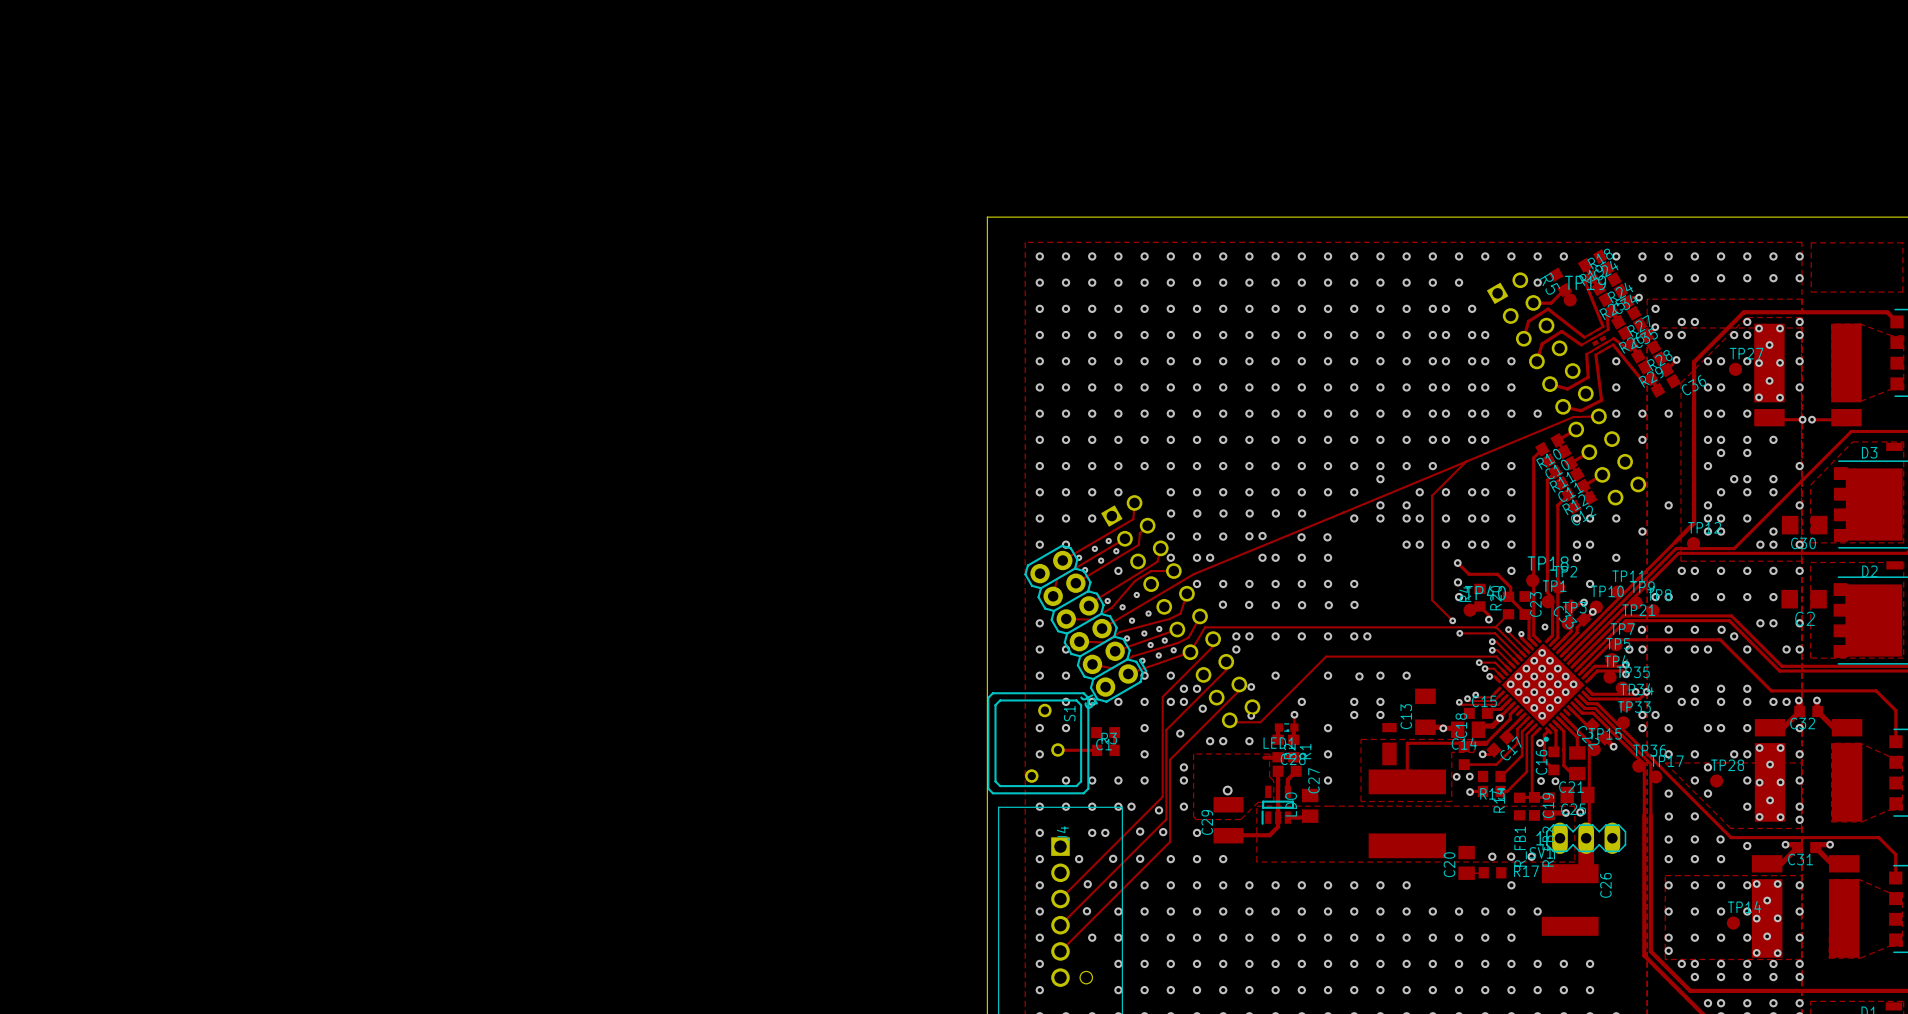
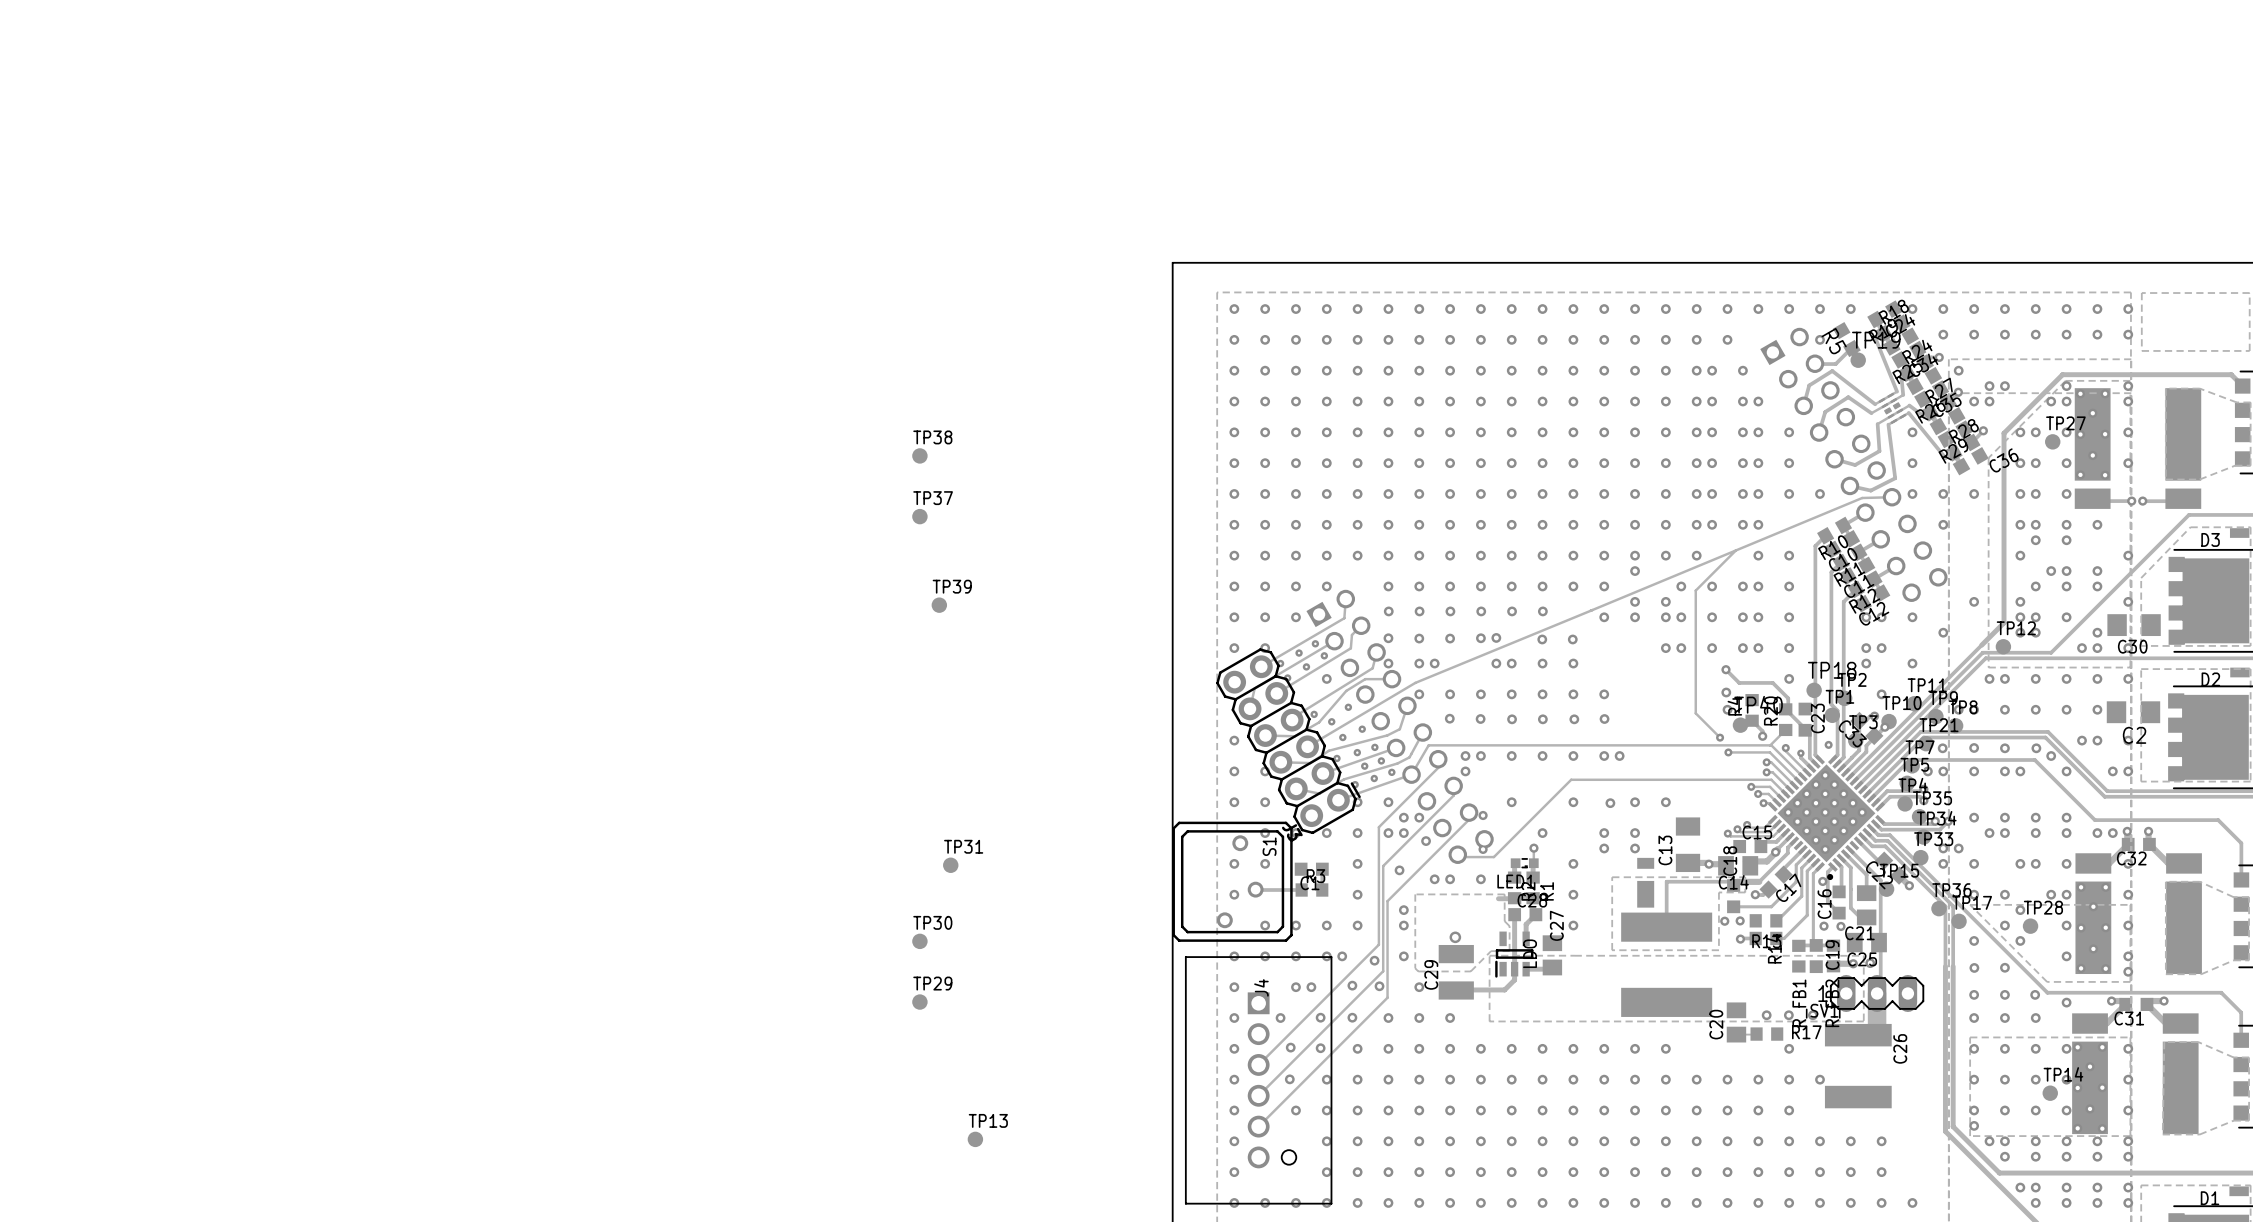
TP38: none -> (919, 455)
TP37: none -> (919, 516)
TP39: none -> (939, 605)
TP31: none -> (950, 865)
TP30: none -> (919, 941)
TP29: none -> (919, 1002)
TP13: none -> (975, 1139)

